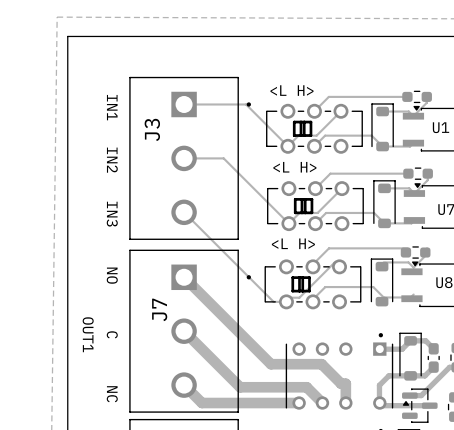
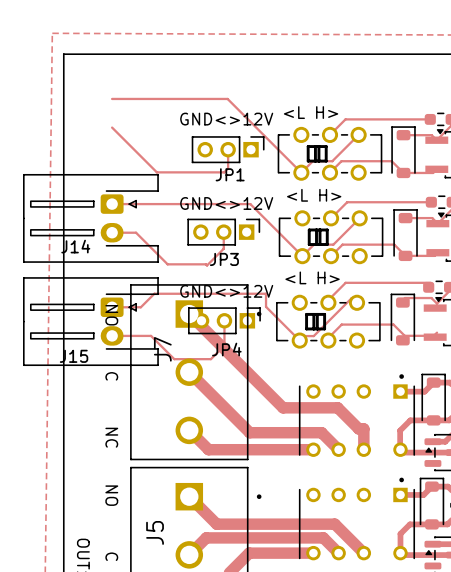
text: none -> GND<>12V (226, 119)
track: none -> (112, 127) (156, 172) (224, 172) (228, 168) (228, 149)
track: (184, 104) (246, 104) -> (112, 98) (227, 98) (256, 127)
text: IN1 (112, 107) -> none
JP1: none -> (228, 149)
track: (184, 158) (223, 158) (240, 175) -> (112, 204) (250, 204)
J3: (190, 158) -> none
text: IN2 (112, 160) -> none
text: none -> GND<>12V (226, 203)
J14: none -> (90, 218)
track: none -> (223, 232) (223, 248) (207, 265) (167, 264) (136, 232) (112, 232)
JP3: none -> (223, 232)
track: (184, 212) (273, 301) (286, 301) -> (112, 307) (140, 307) (154, 293) (266, 293) (266, 306) (299, 340)
text: IN3 (112, 214) -> none
text: none -> GND<>12V (226, 291)
track: none -> (224, 320) (224, 345) (210, 359) (174, 359) (151, 335) (112, 335)
JP4: none -> (224, 320)
J15: none -> (90, 321)
text: OUT1 (88, 334) -> none

